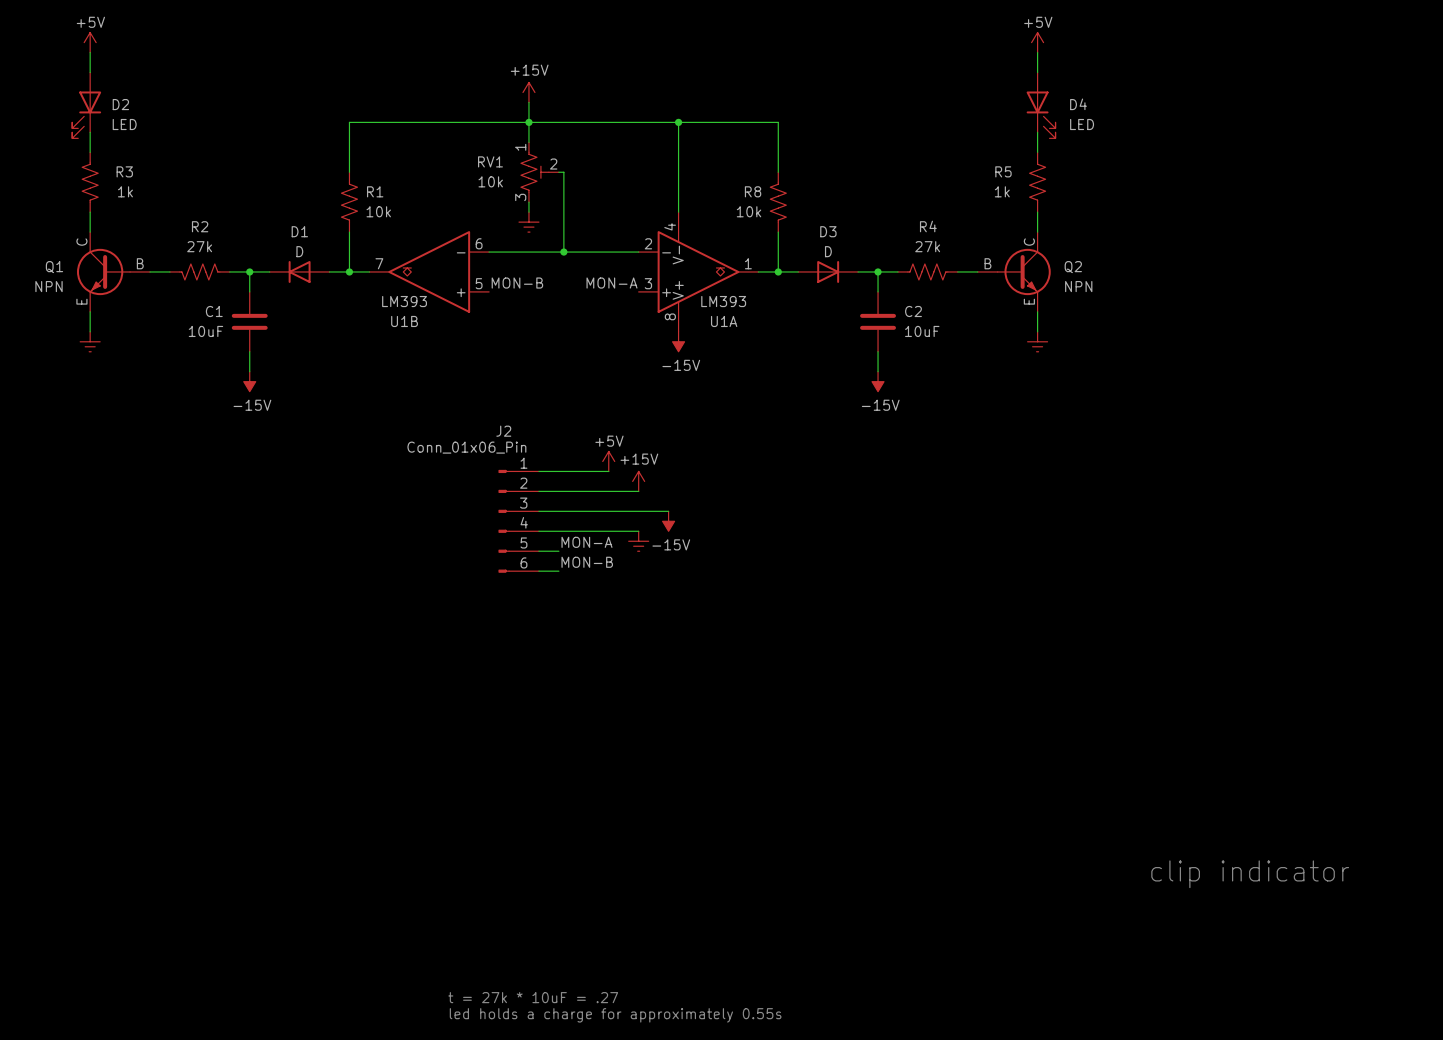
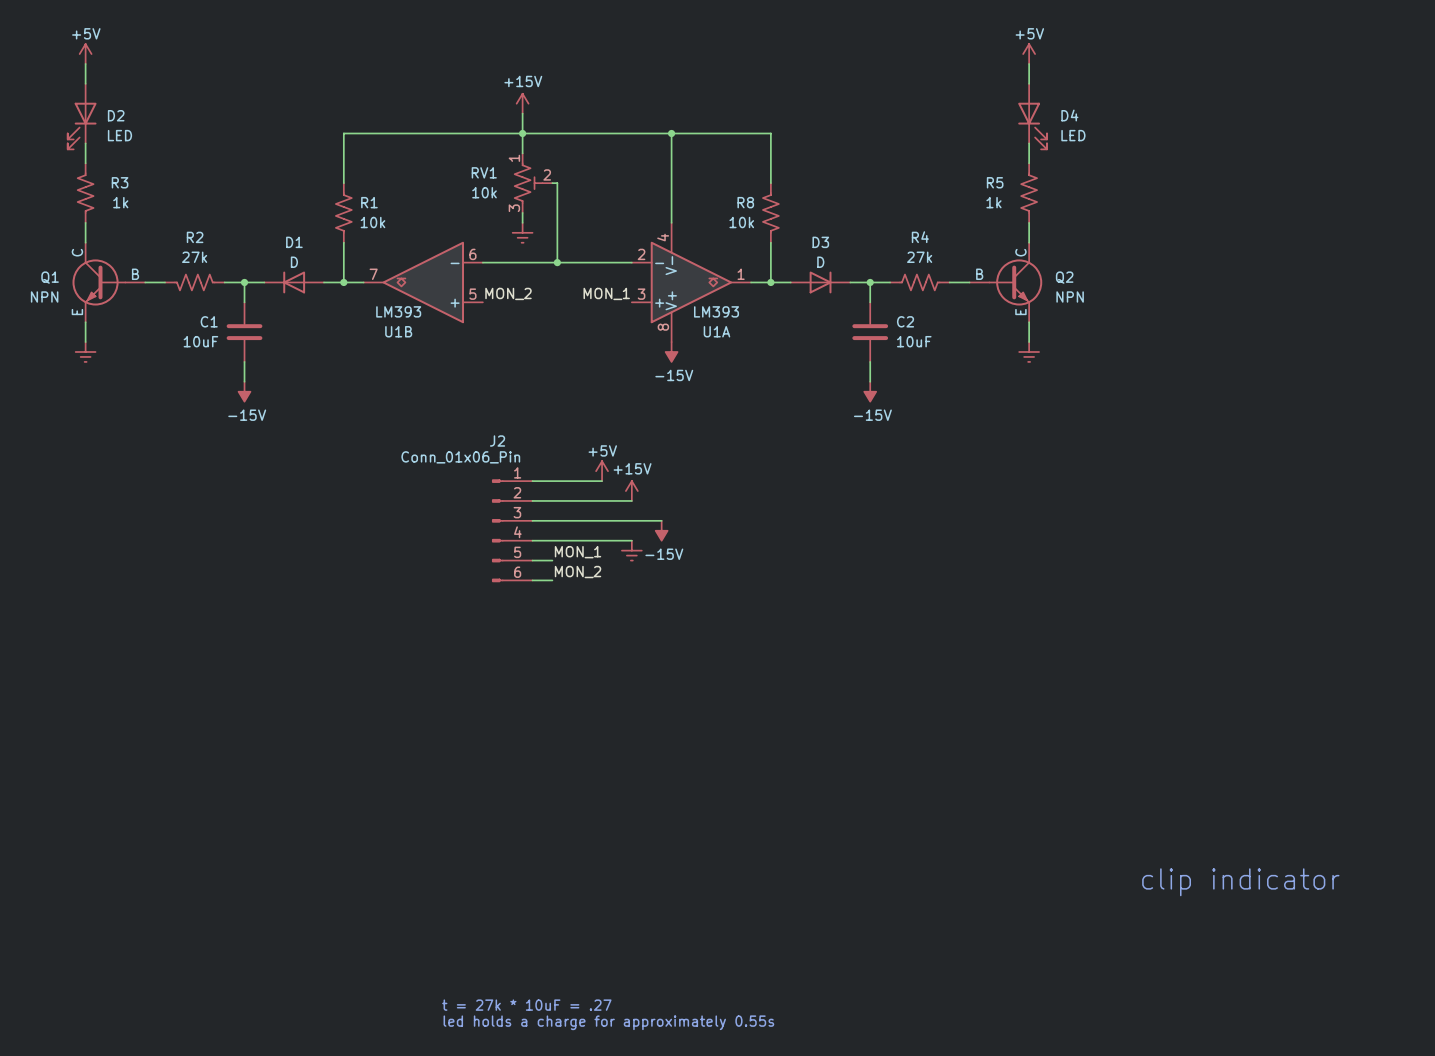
label: MON-B (517, 283) -> MON_2 (508, 293)
label: MON-A (612, 283) -> MON_1 (606, 293)
label: MON-A (586, 542) -> MON_1 (578, 552)
label: MON-B (587, 562) -> MON_2 (578, 572)

